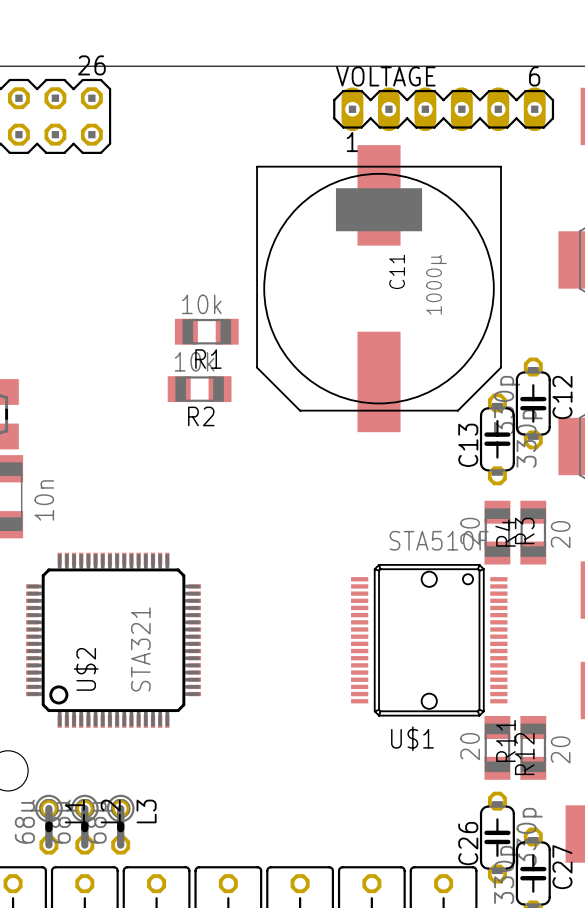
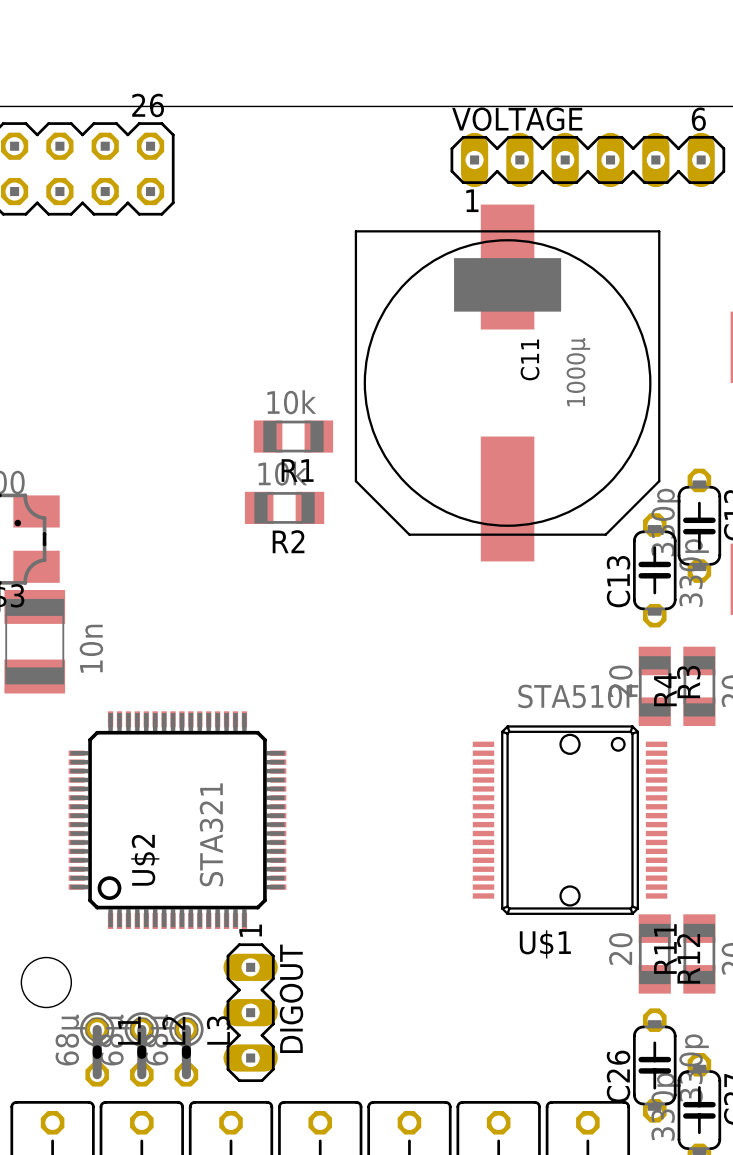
DIGOUT: none -> (250, 1012)

